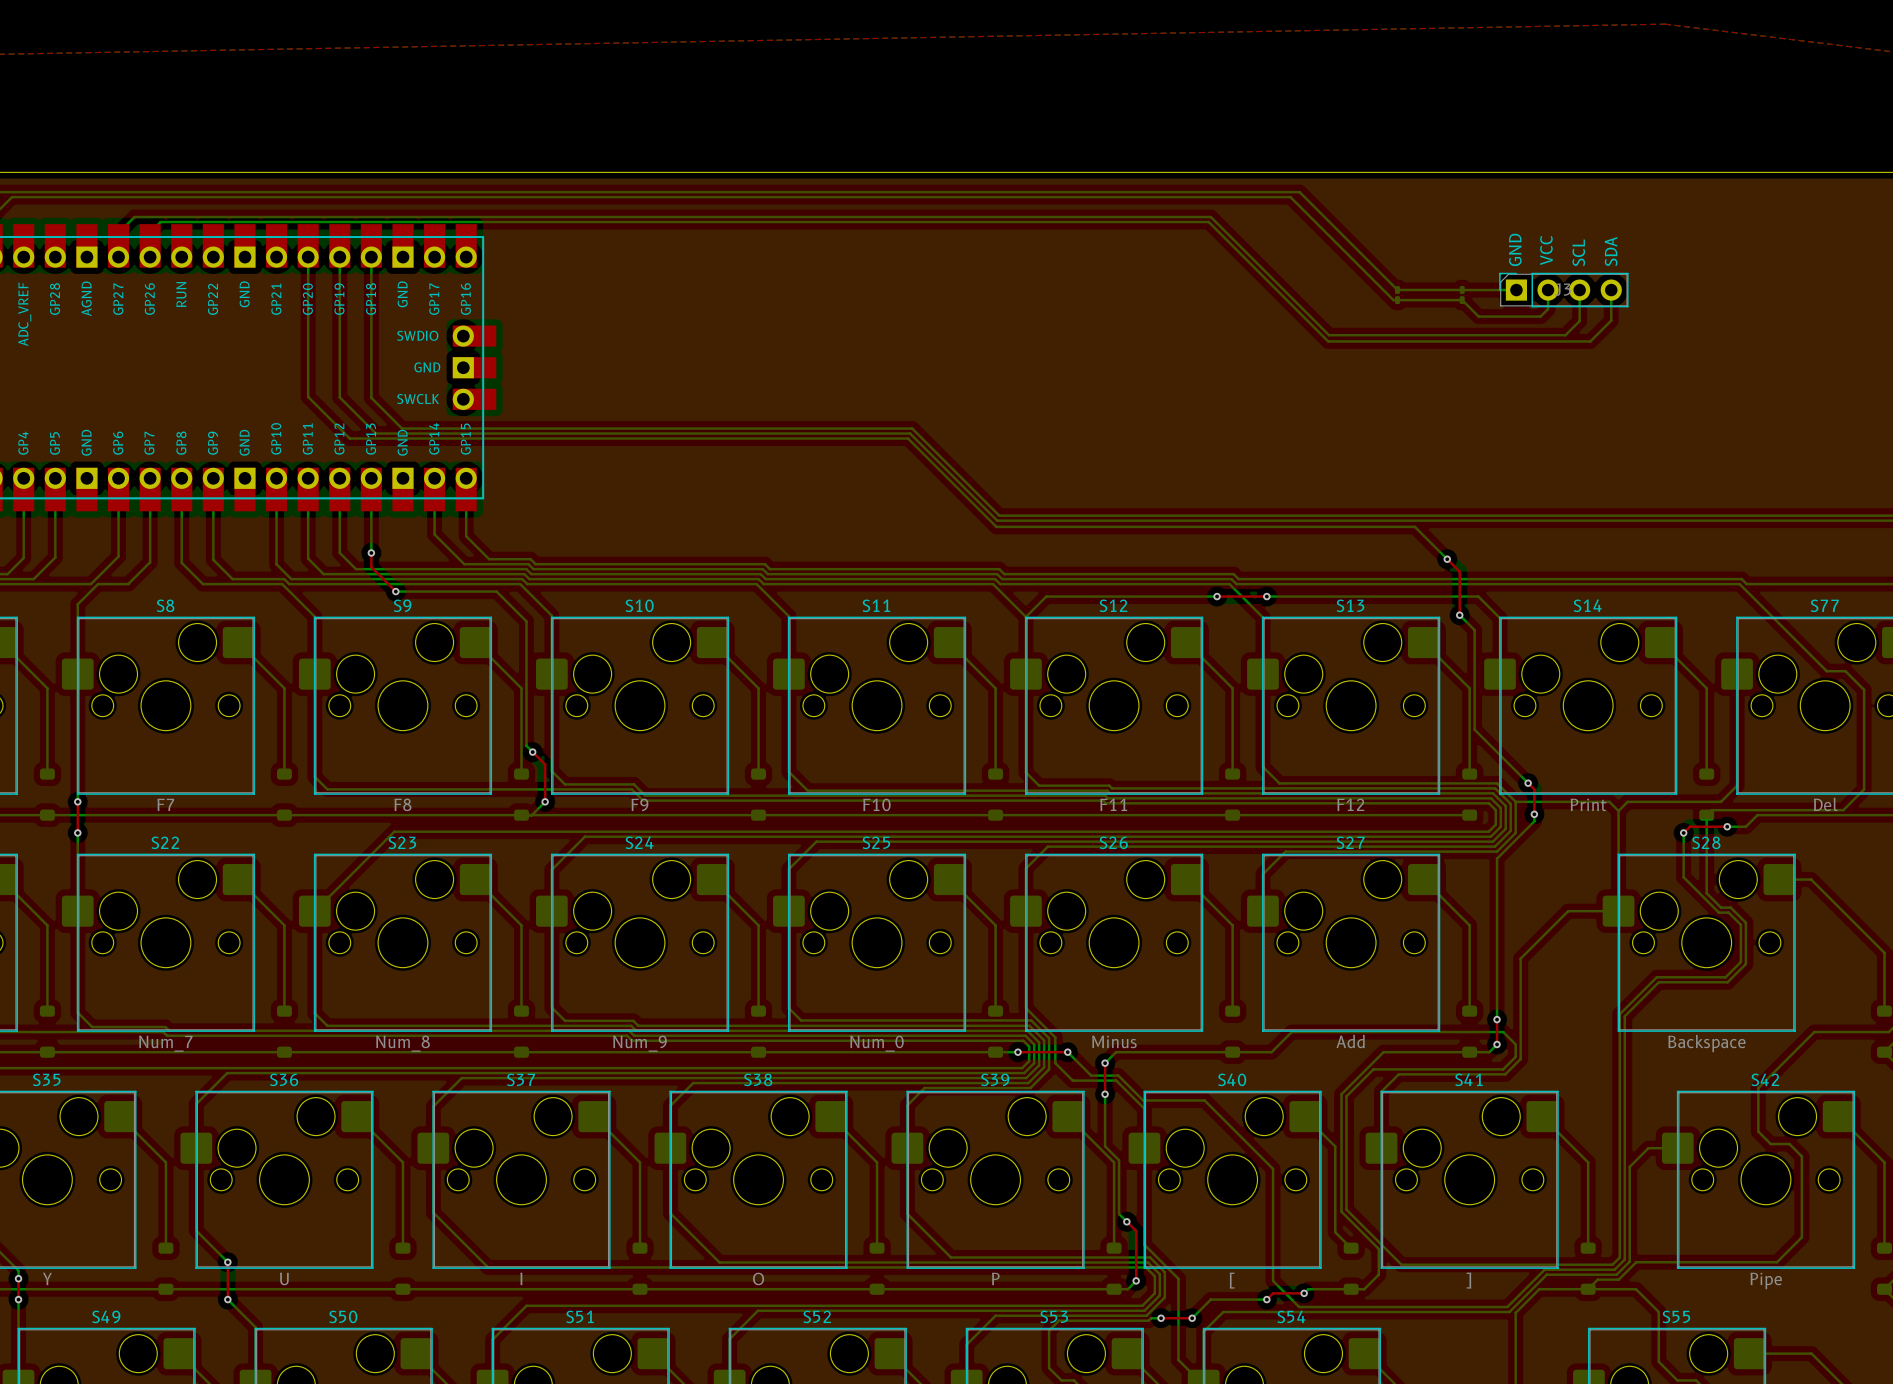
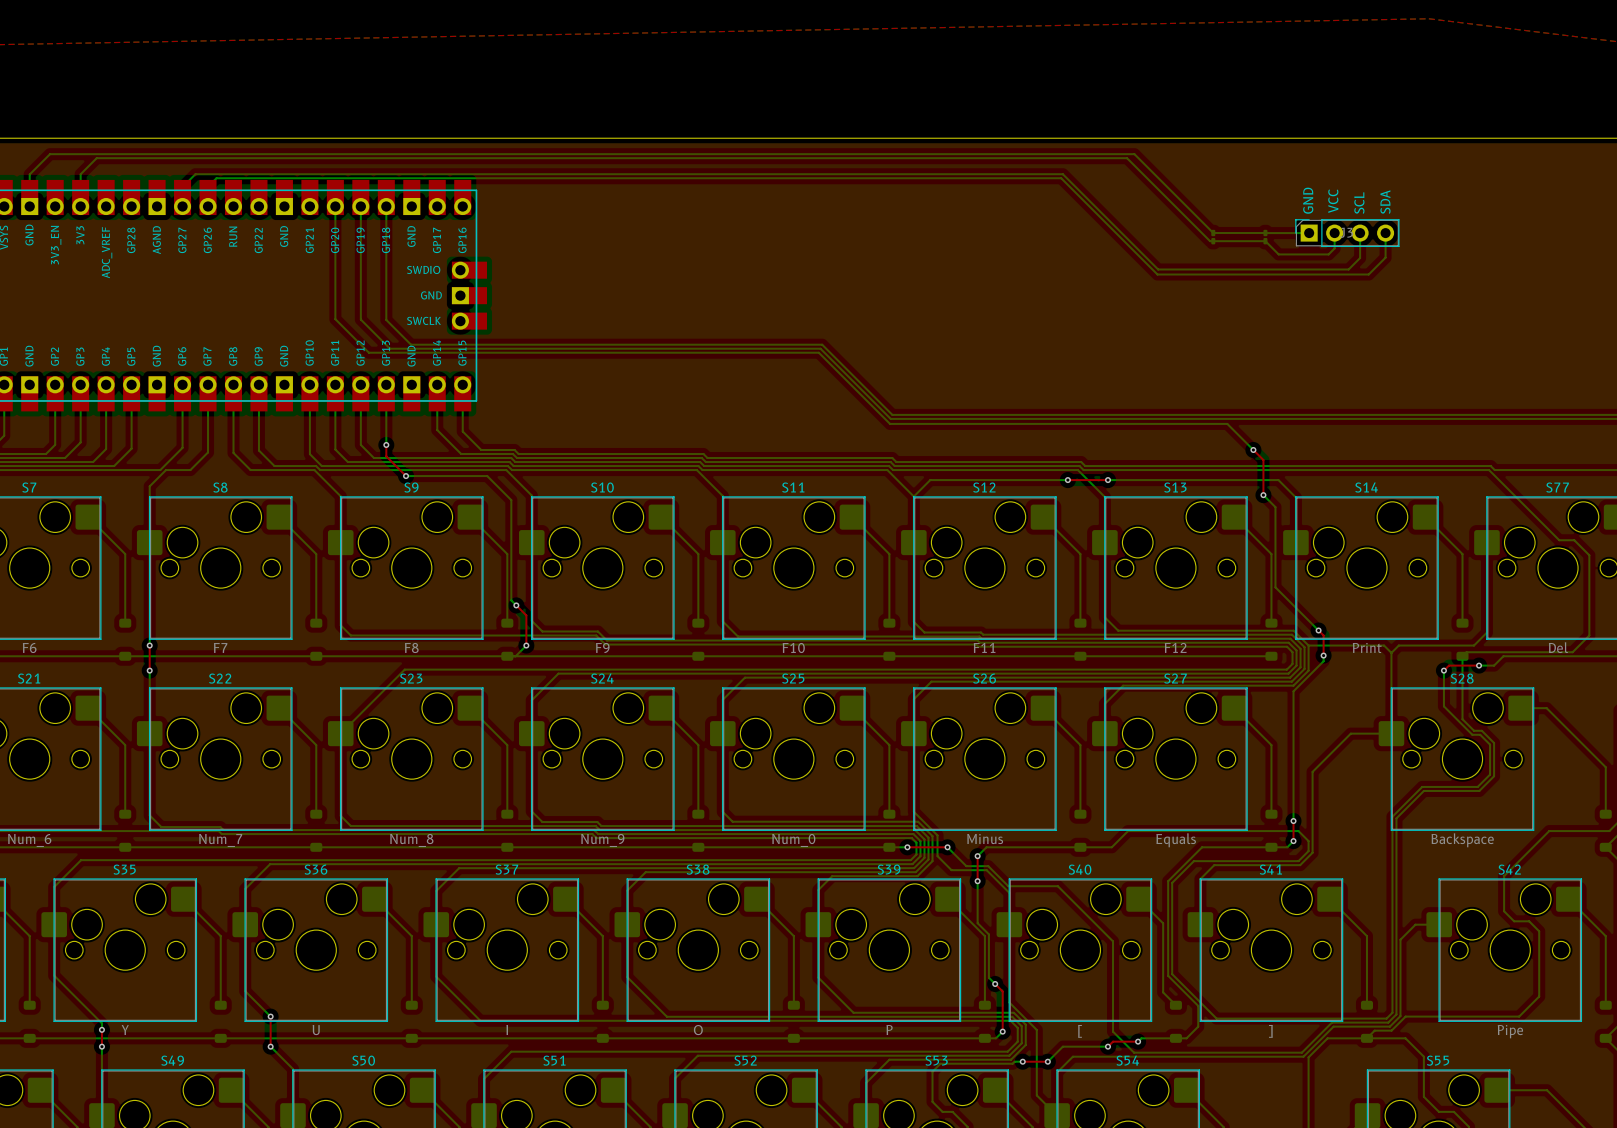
S27 value: Add (1350, 1041) -> Equals (1176, 840)

